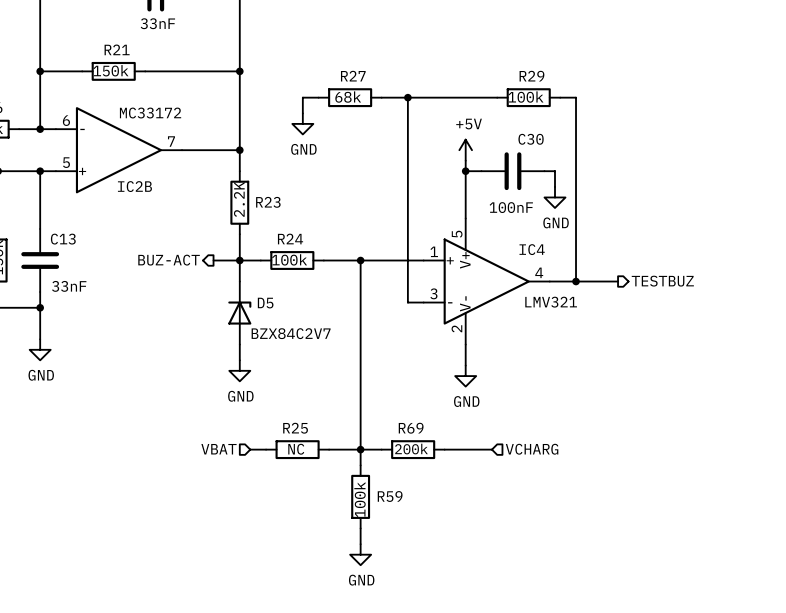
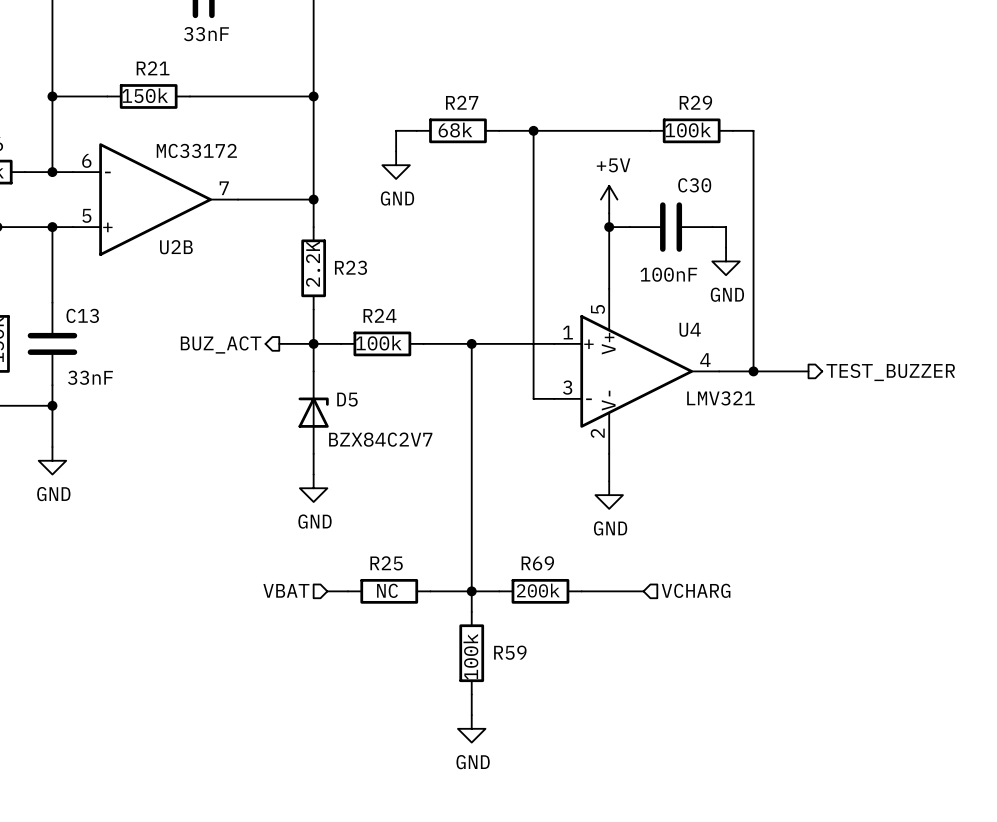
IC2B name: IC2B (134, 186) -> U2B (176, 247)
IC4 name: IC4 (532, 249) -> U4 (690, 329)
hierarchical label: BUZ-ACT (169, 260) -> BUZ_ACT (221, 344)
hierarchical label: TESTBUZ (662, 281) -> TEST_BUZZER (890, 372)

